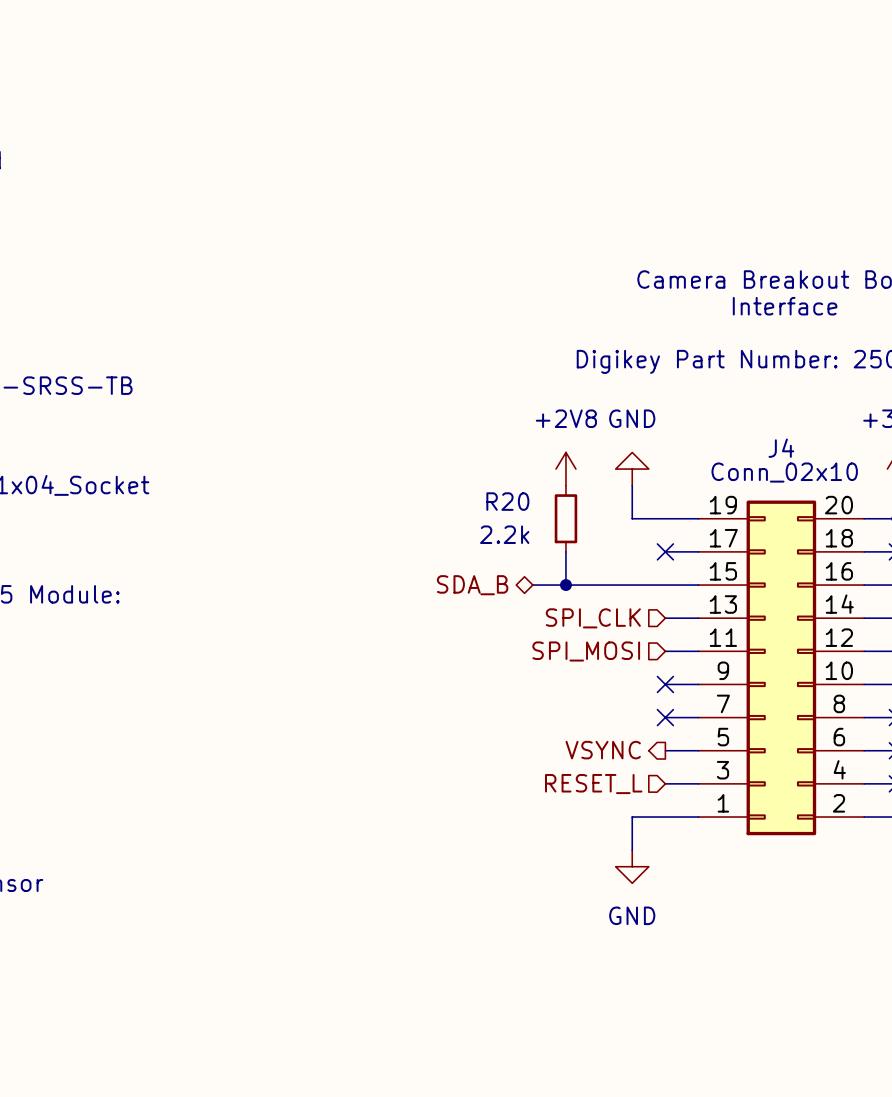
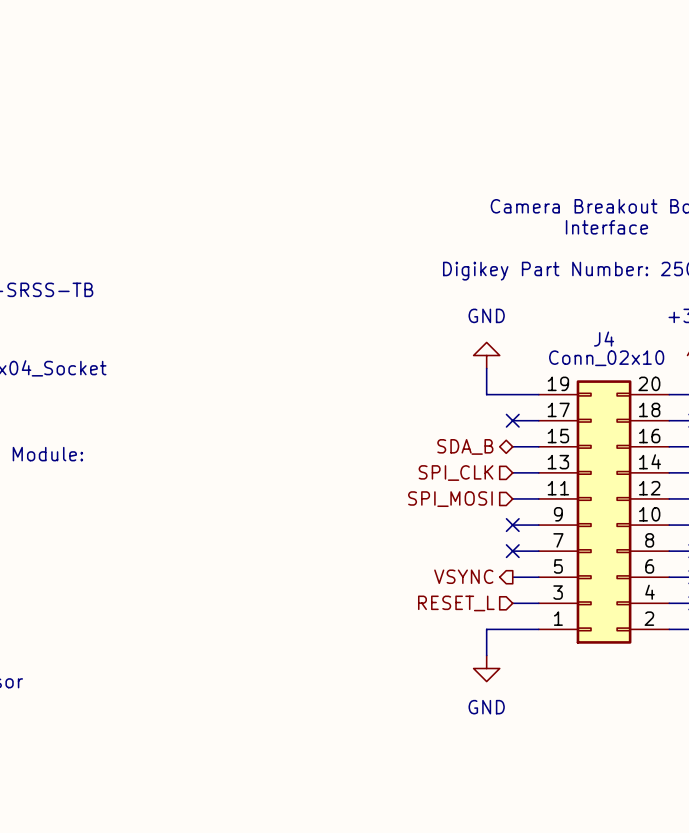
power symbol: +2V8 (565, 469) -> none
R20: 2.2k (565, 518) -> none
wire: (565, 551) (565, 585) -> none
hierarchical label position: SDA_B (472, 585) -> SDA_B (465, 446)
wire: (532, 585) (665, 585) -> none
junction: (565, 585) -> none

